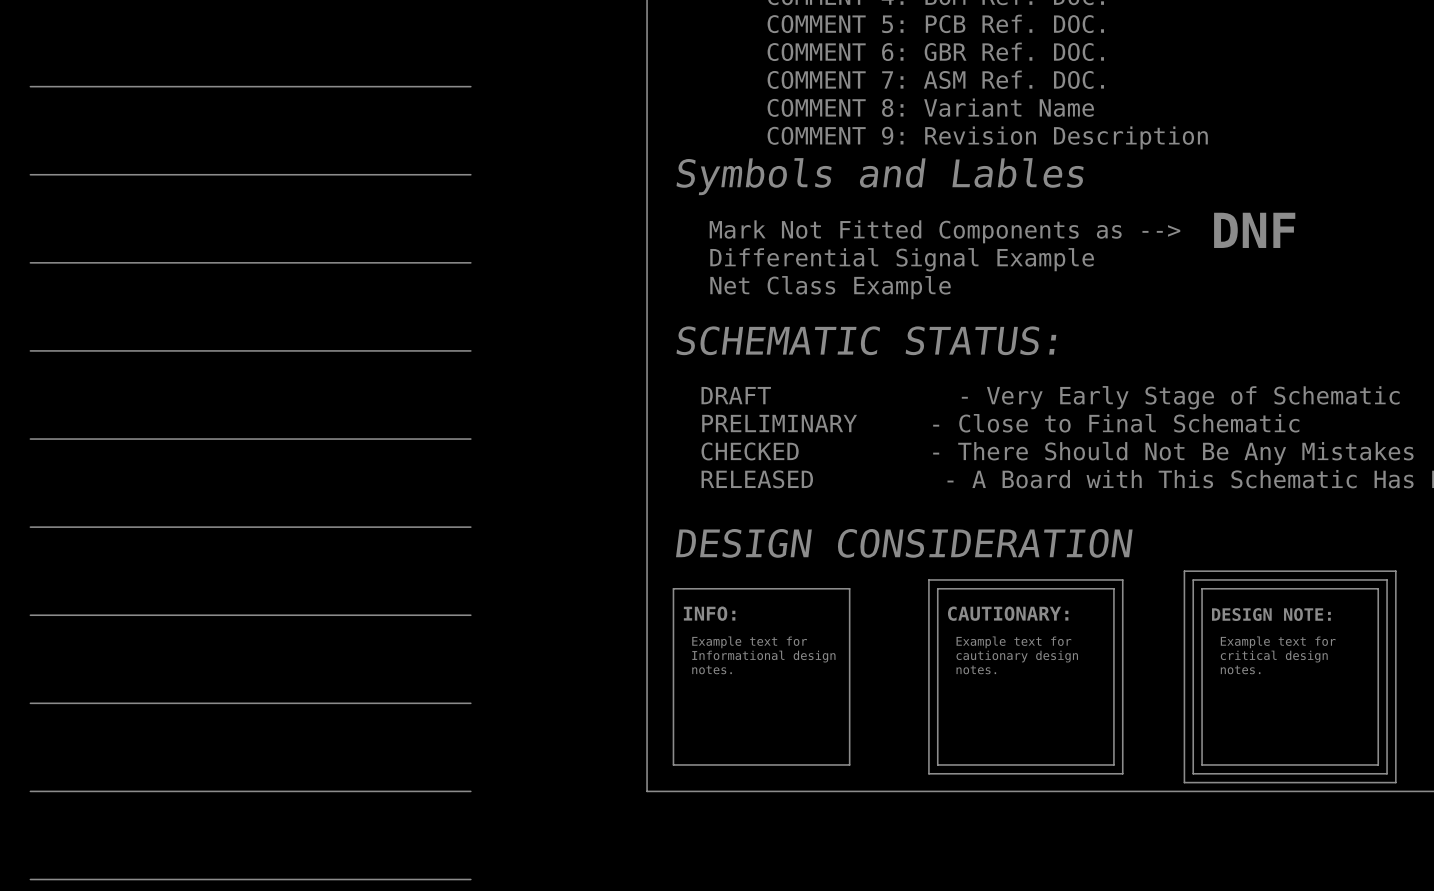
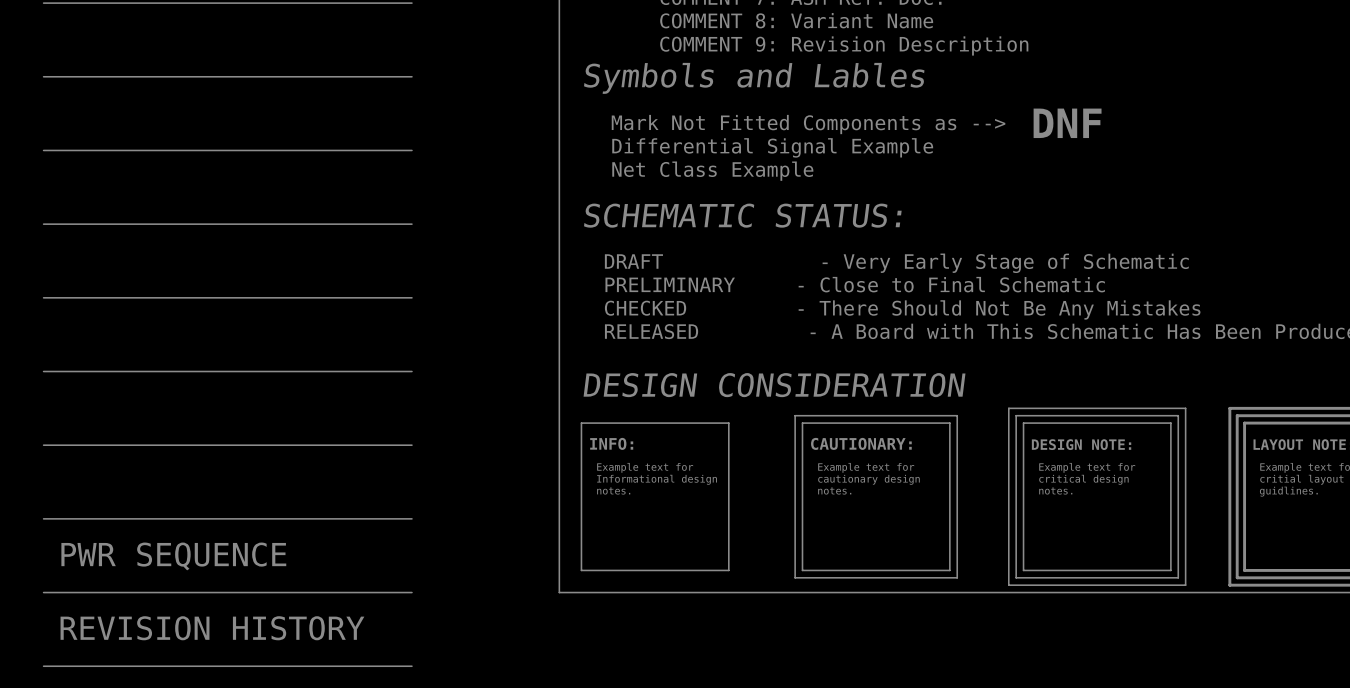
text: none -> PWR SEQUENCE (173, 556)
text: none -> REVISION HISTORY (212, 628)

